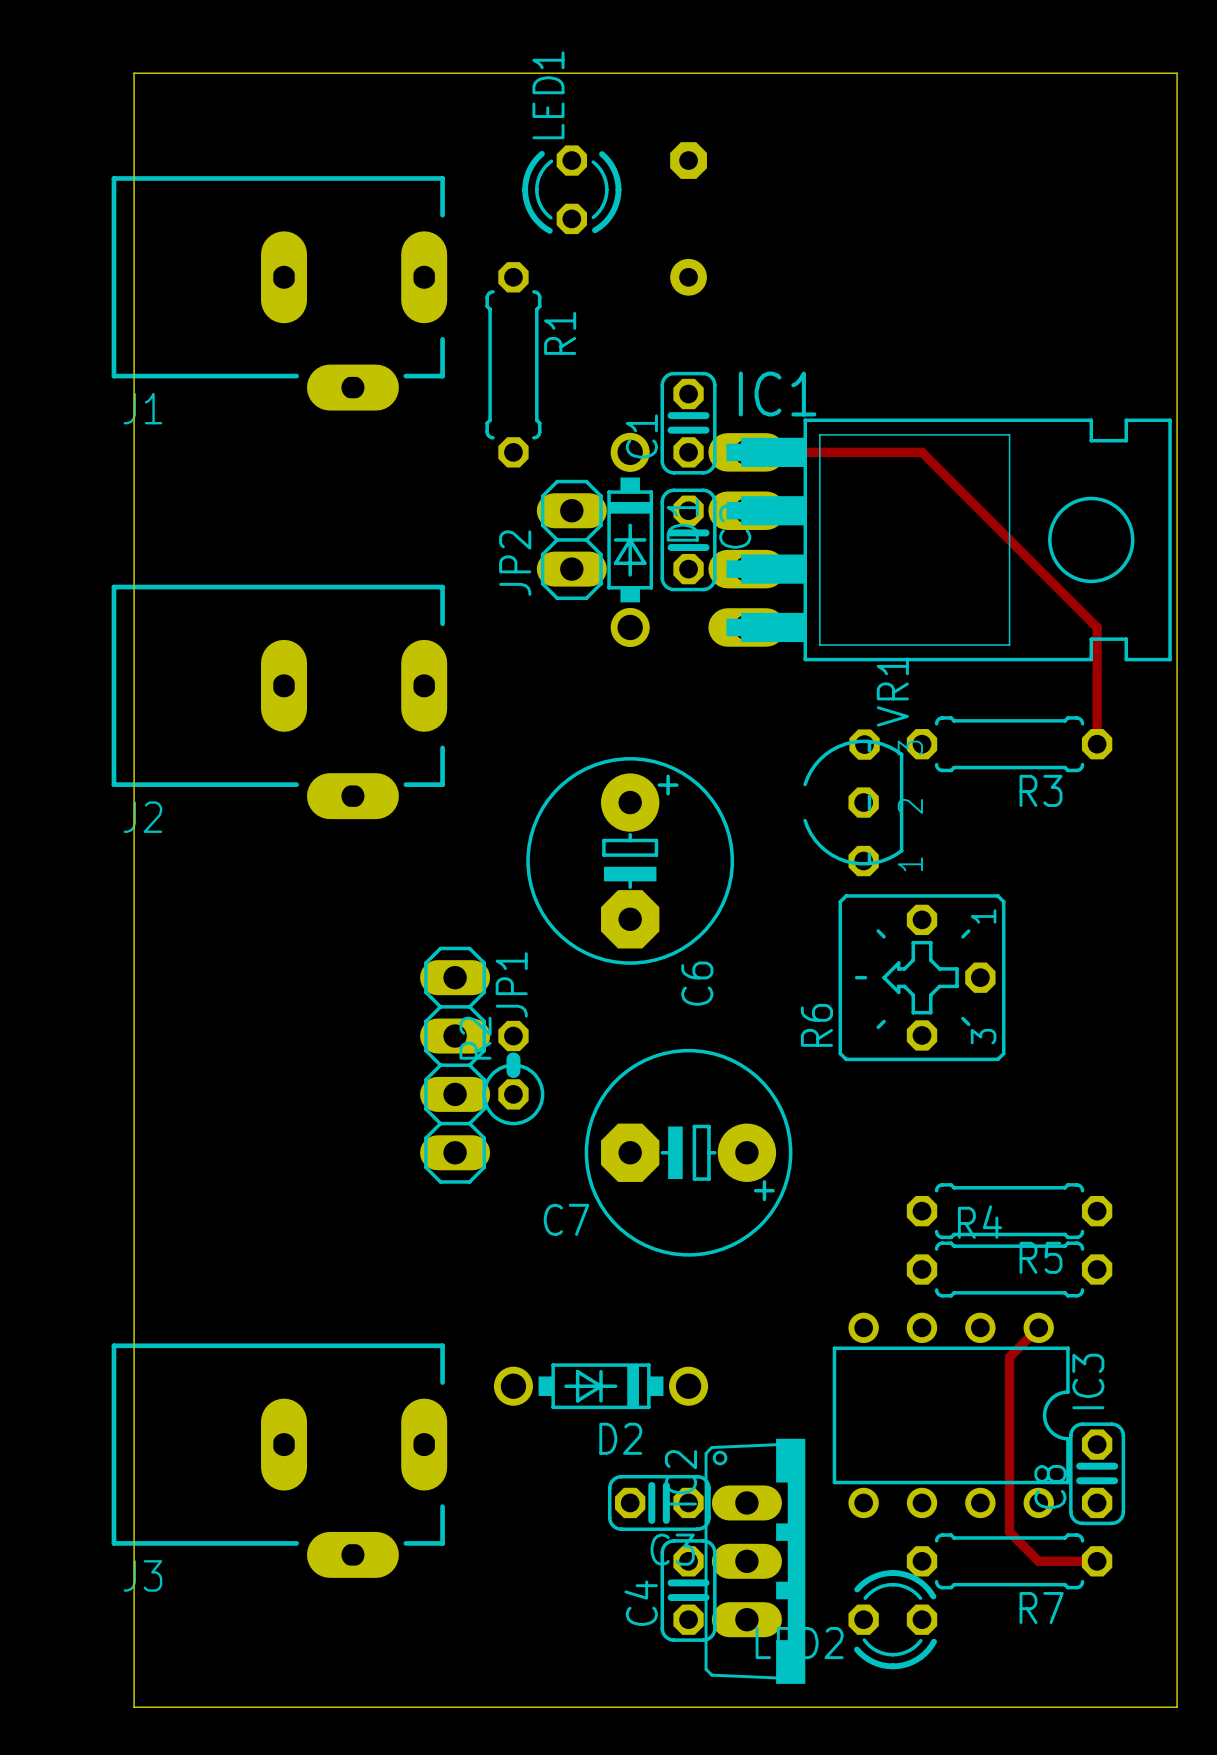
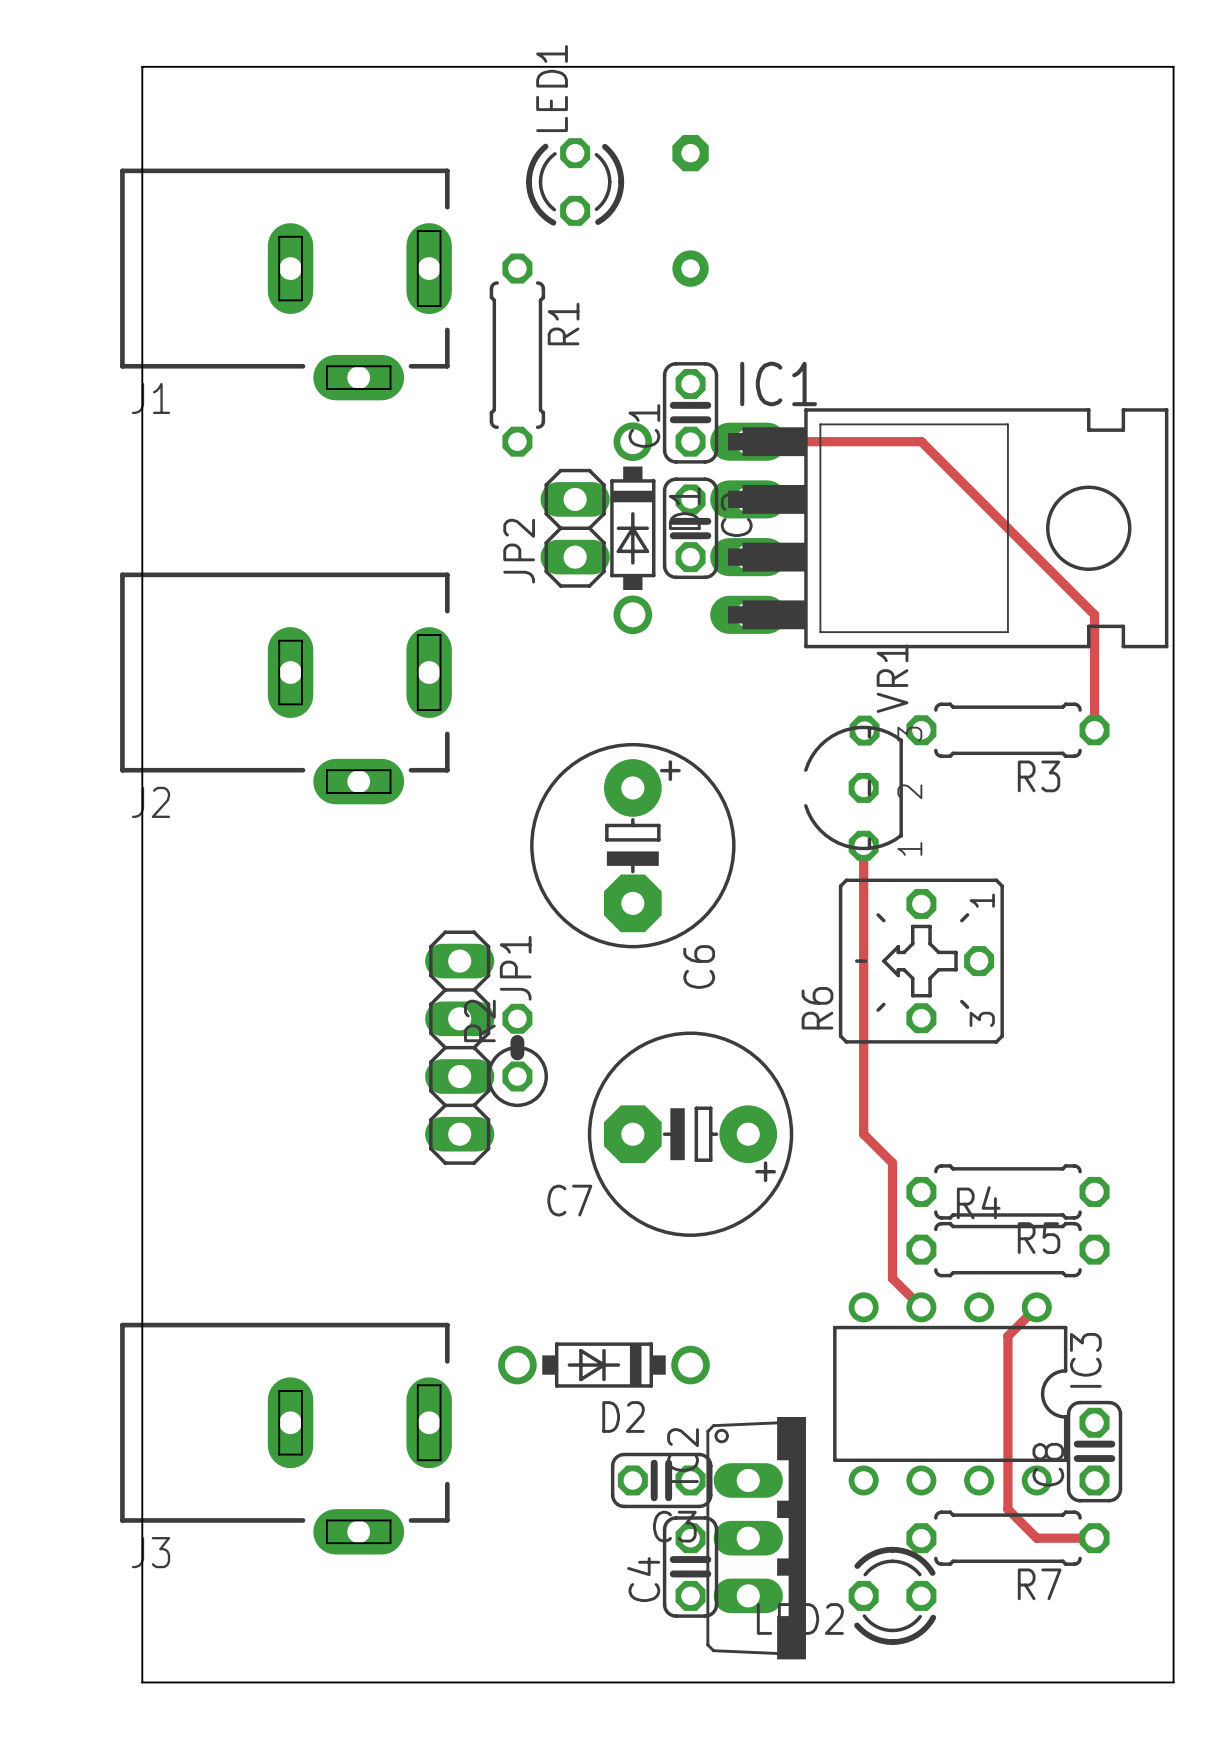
track: none -> (863, 845) (863, 1134) (892, 1163) (892, 1278) (921, 1307)

